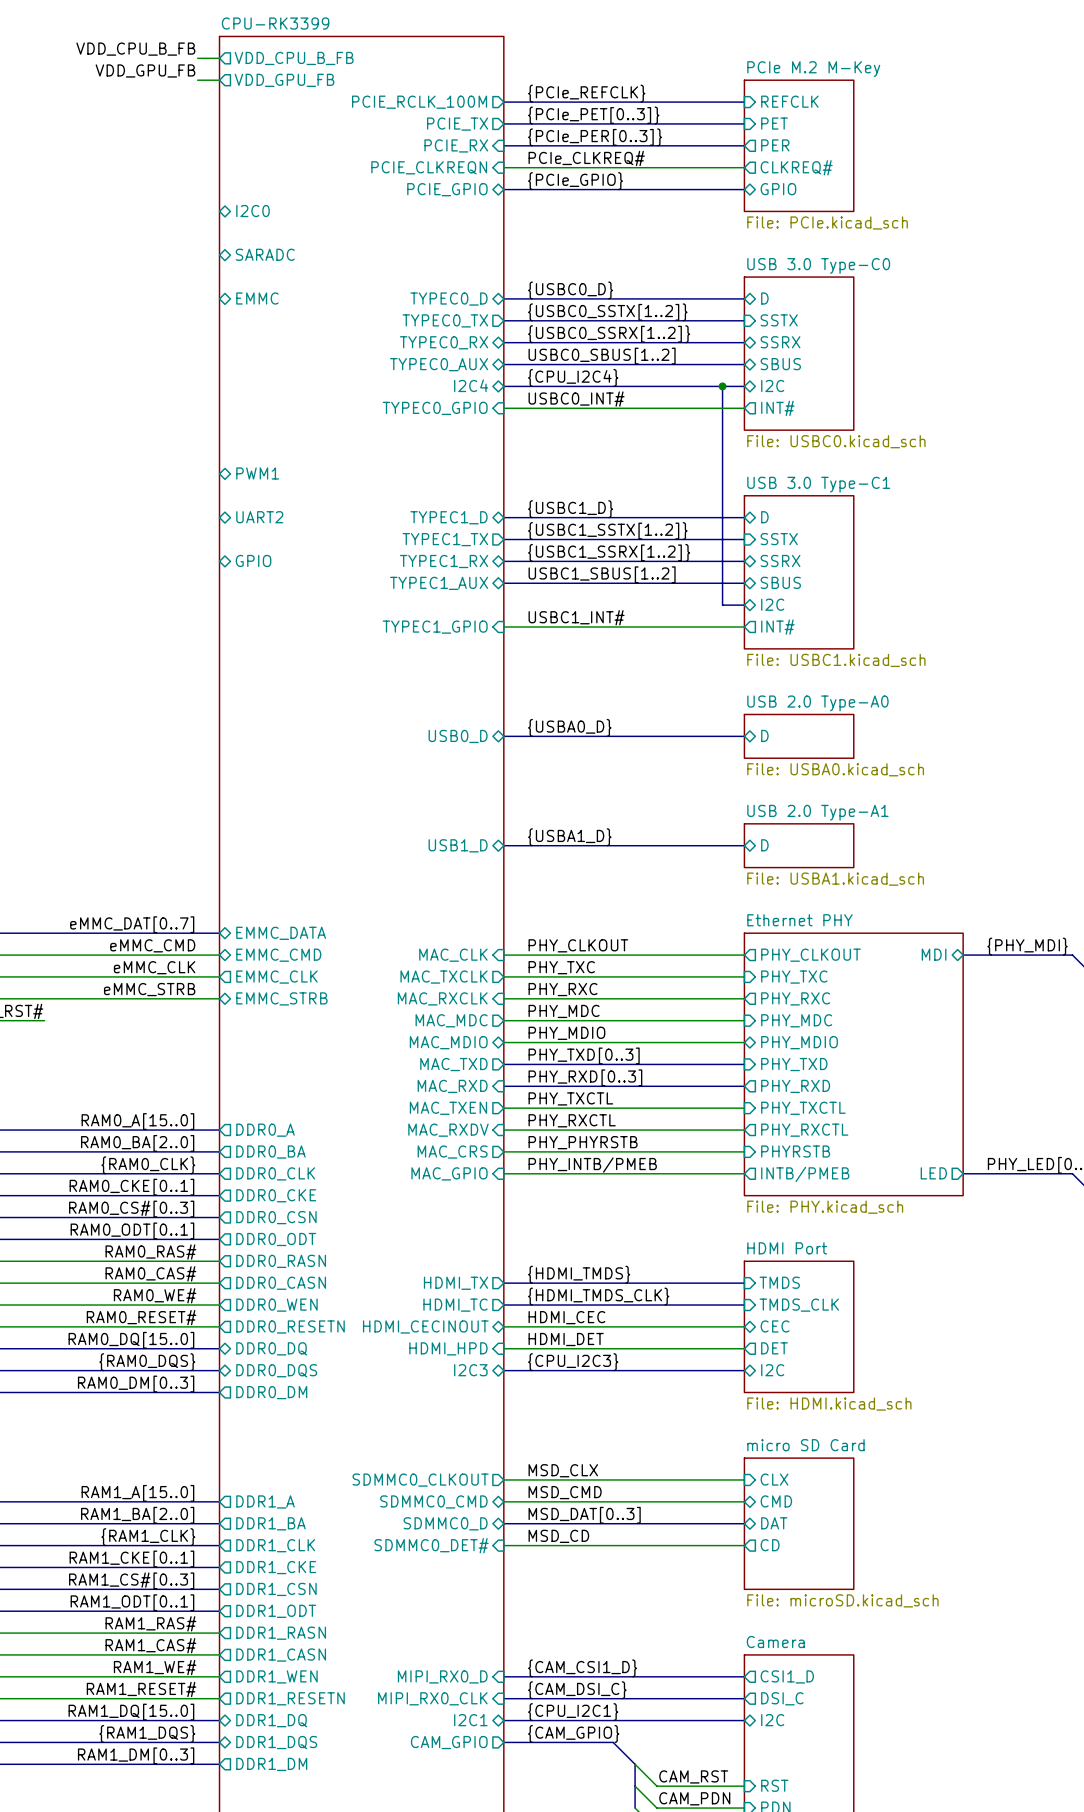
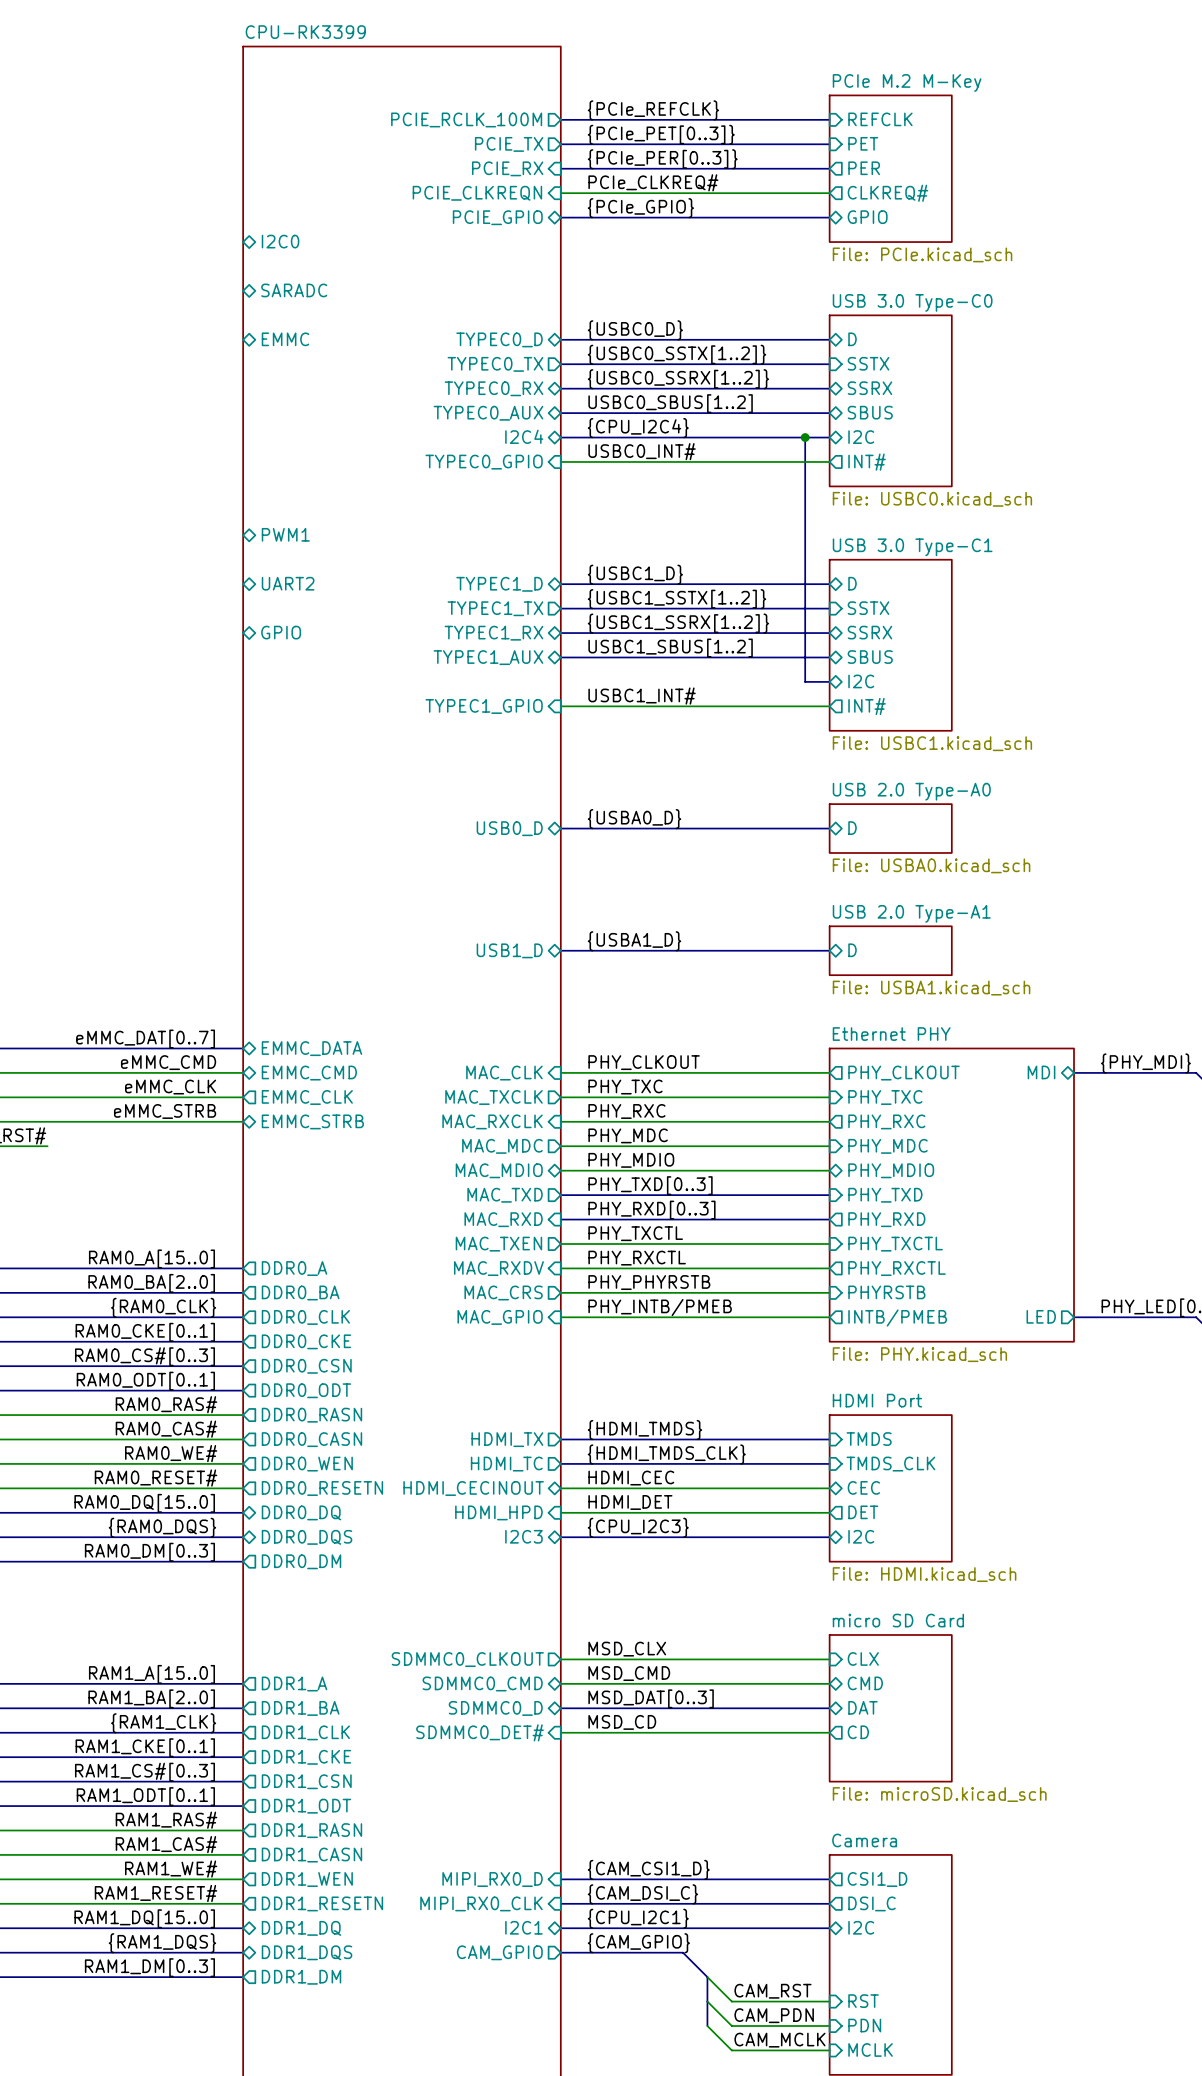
label: VDD_CPU_B_FB (135, 49) -> none
wire: (197, 58) (219, 58) -> none
sheet pin: VDD_CPU_B_FB (294, 58) -> none
label: VDD_GPU_FB (145, 70) -> none
wire: (197, 80) (219, 80) -> none
sheet pin: VDD_GPU_FB (284, 80) -> none

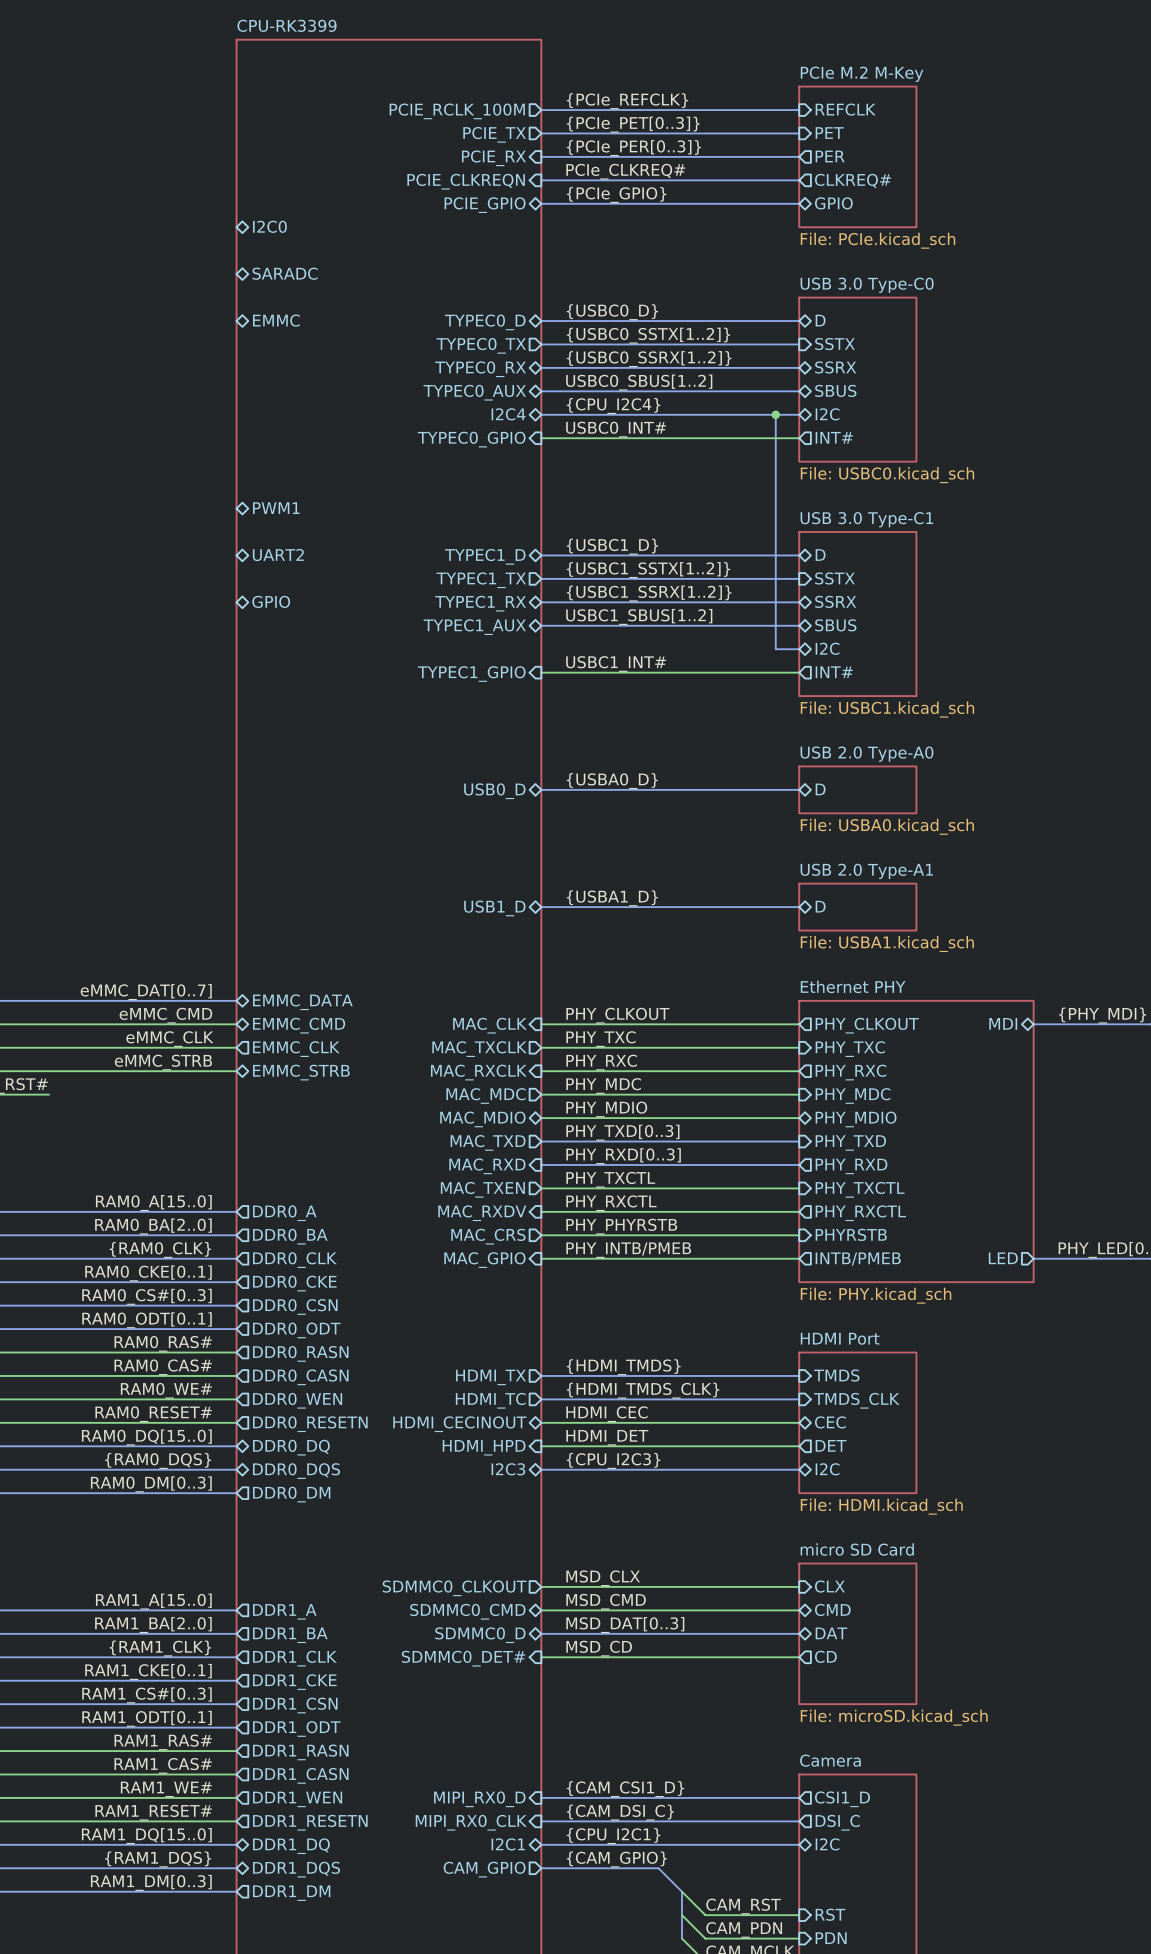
bus: none -> (541, 180) (799, 180)

